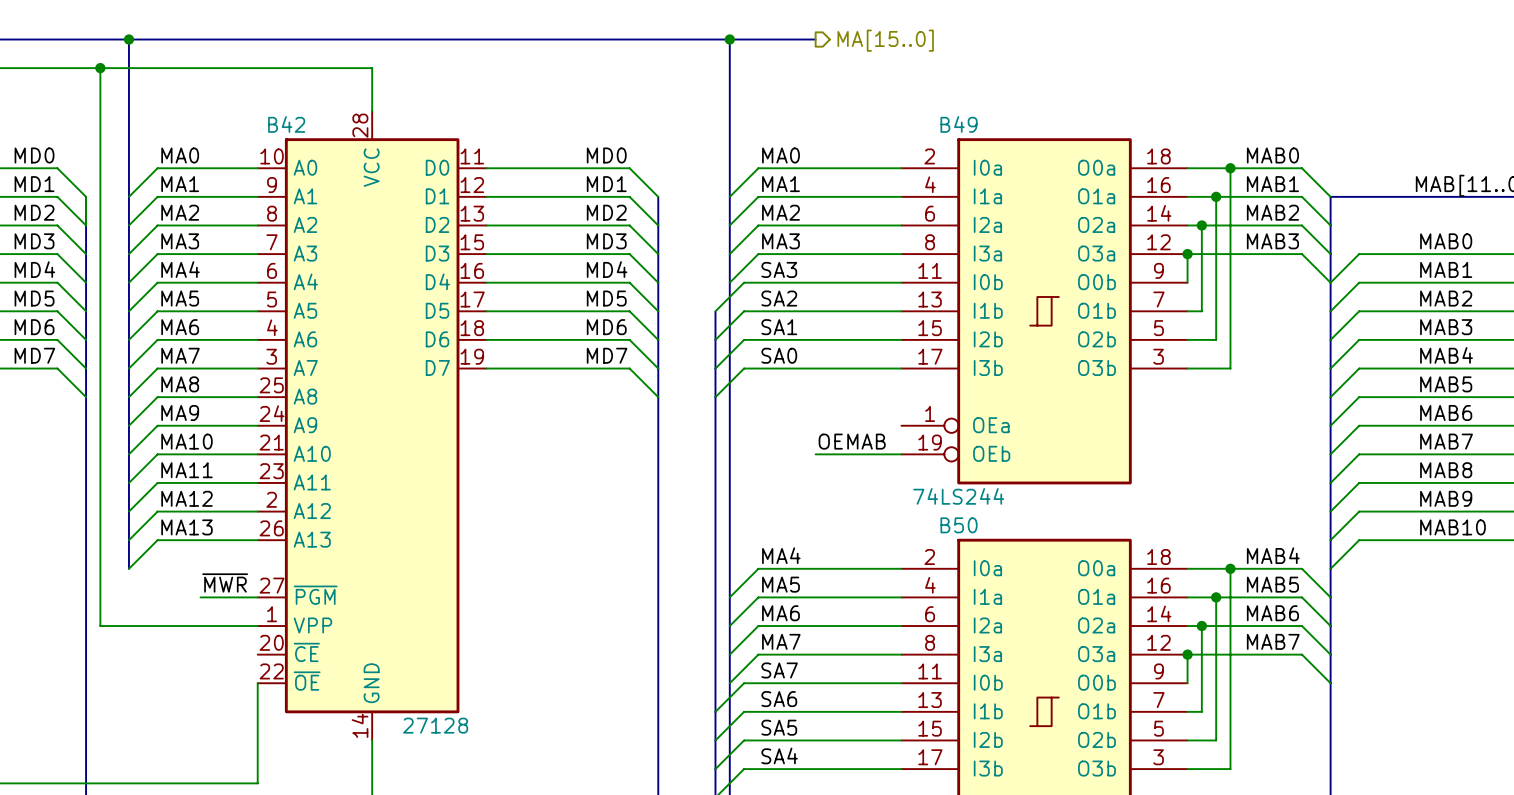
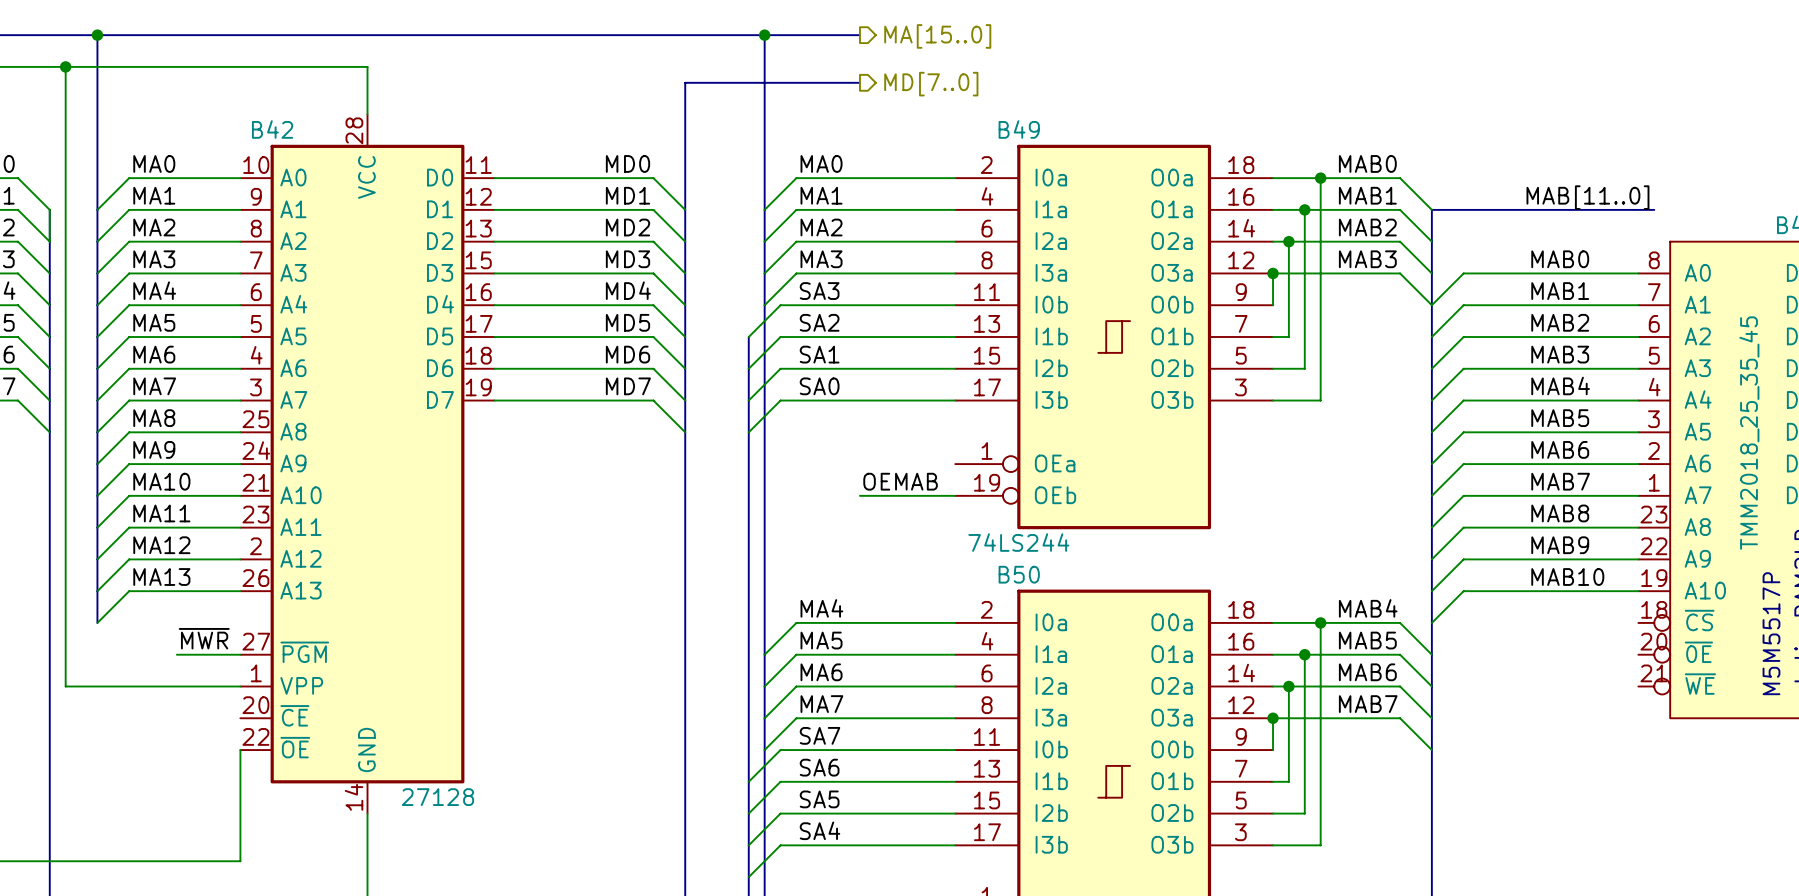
bus: none -> (859, 82) (685, 82) (685, 209)
hierarchical label: none -> MD[7..0] (931, 84)

